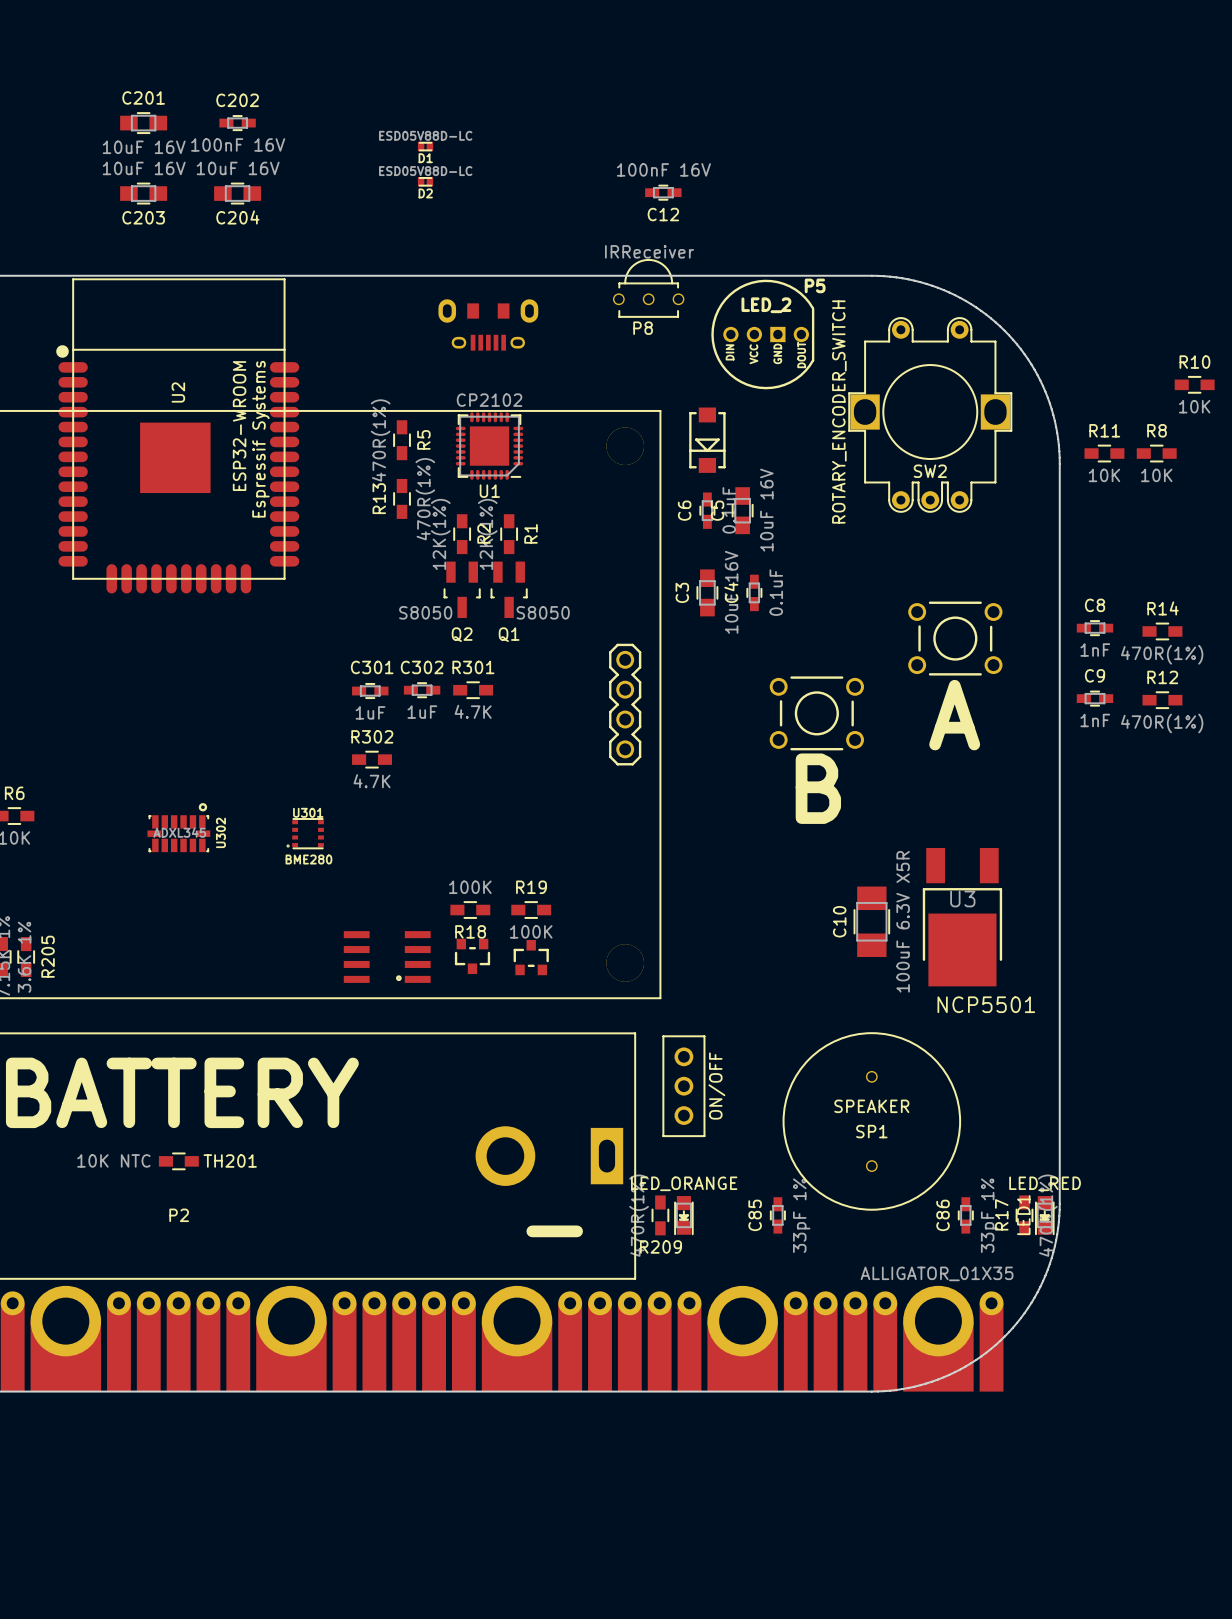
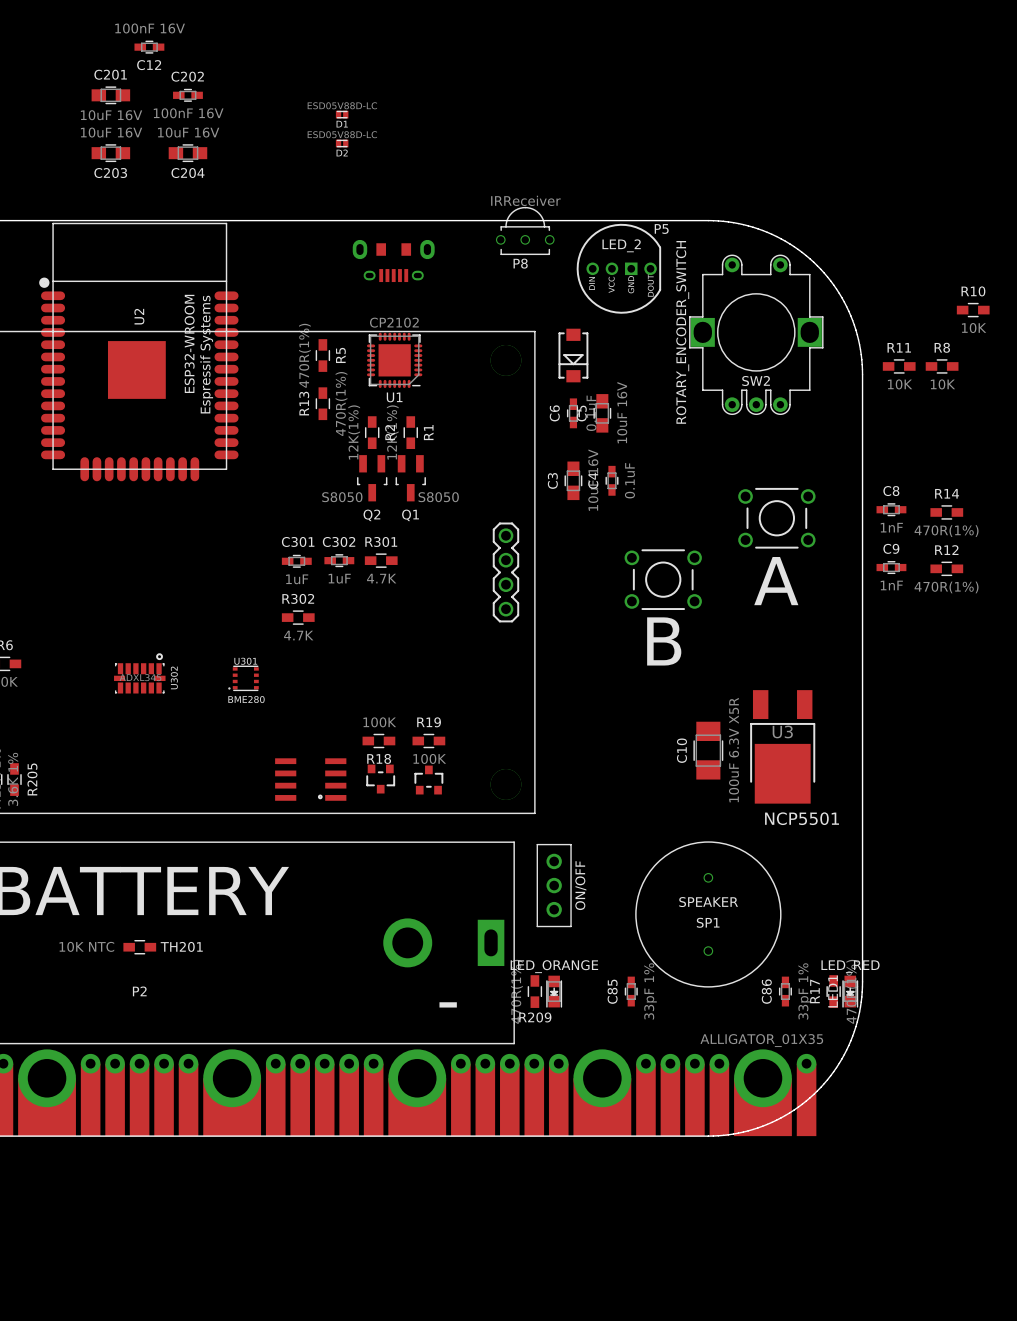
C12 position: (663, 192) -> (149, 47)

